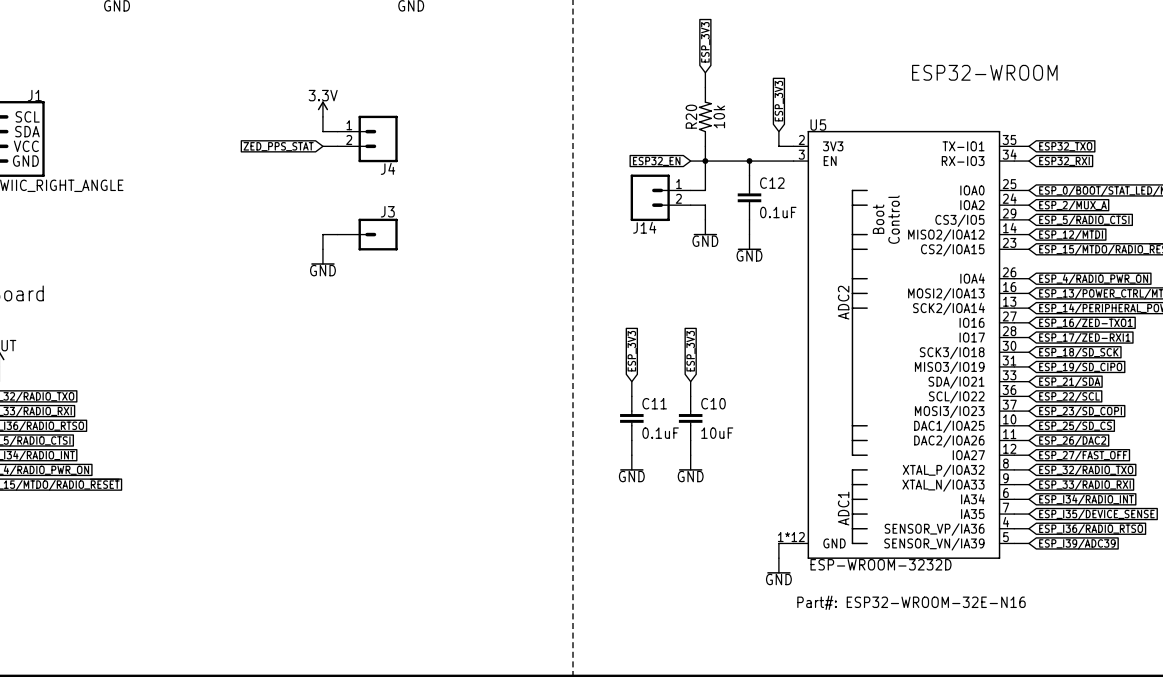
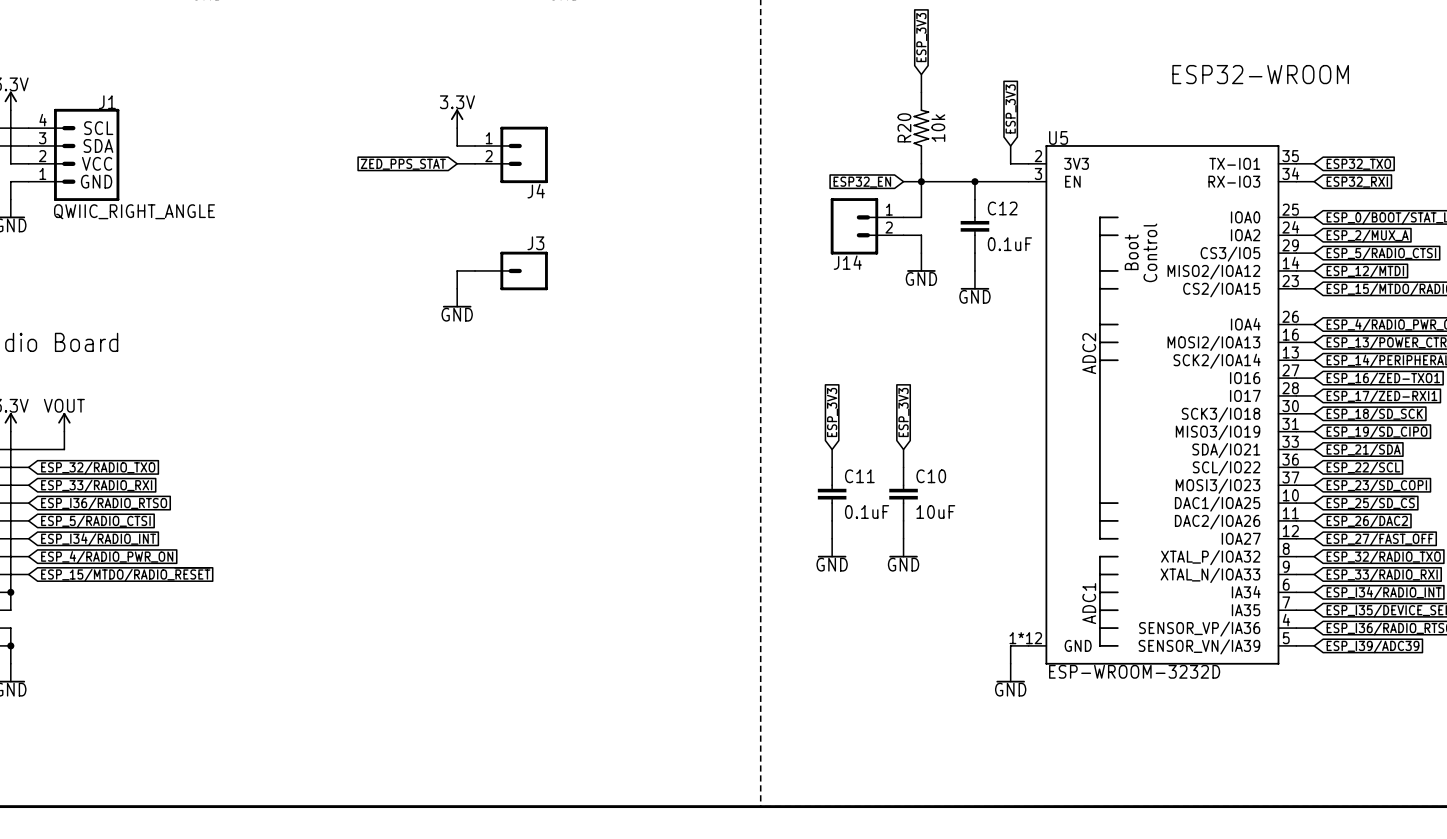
text: Part#: ESP32-WROOM-32E-N16 (911, 602) -> none

